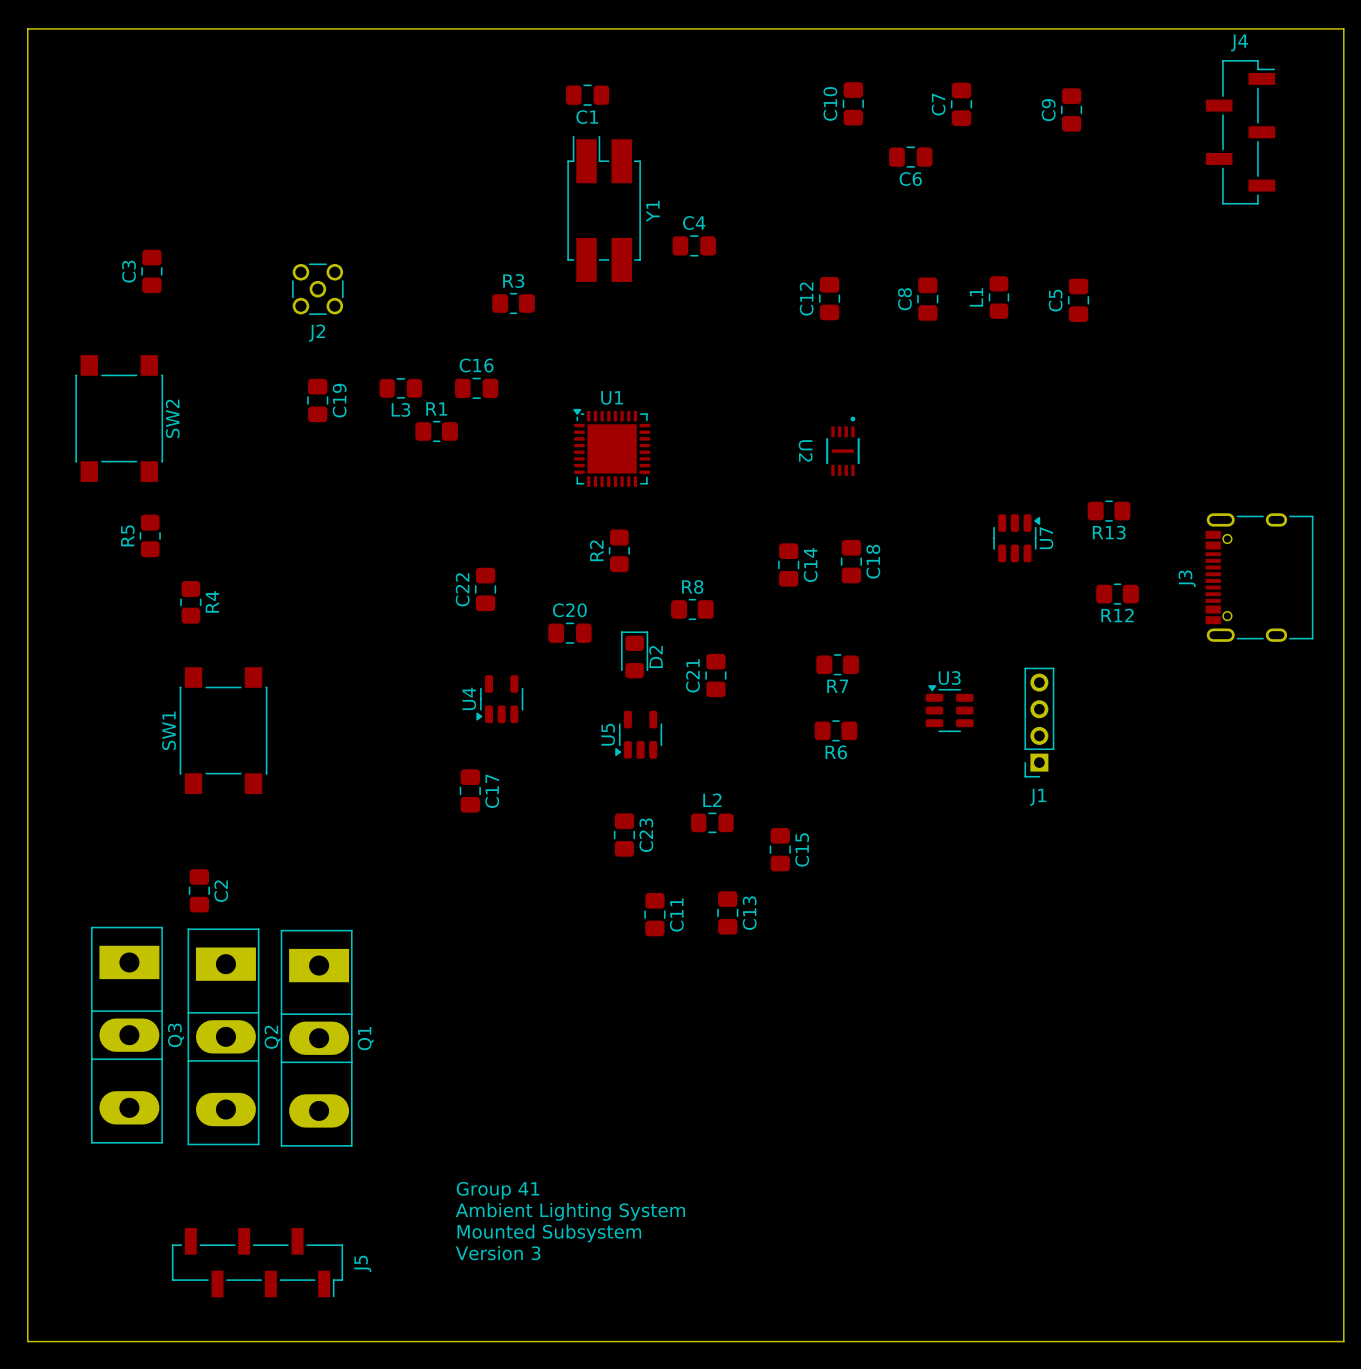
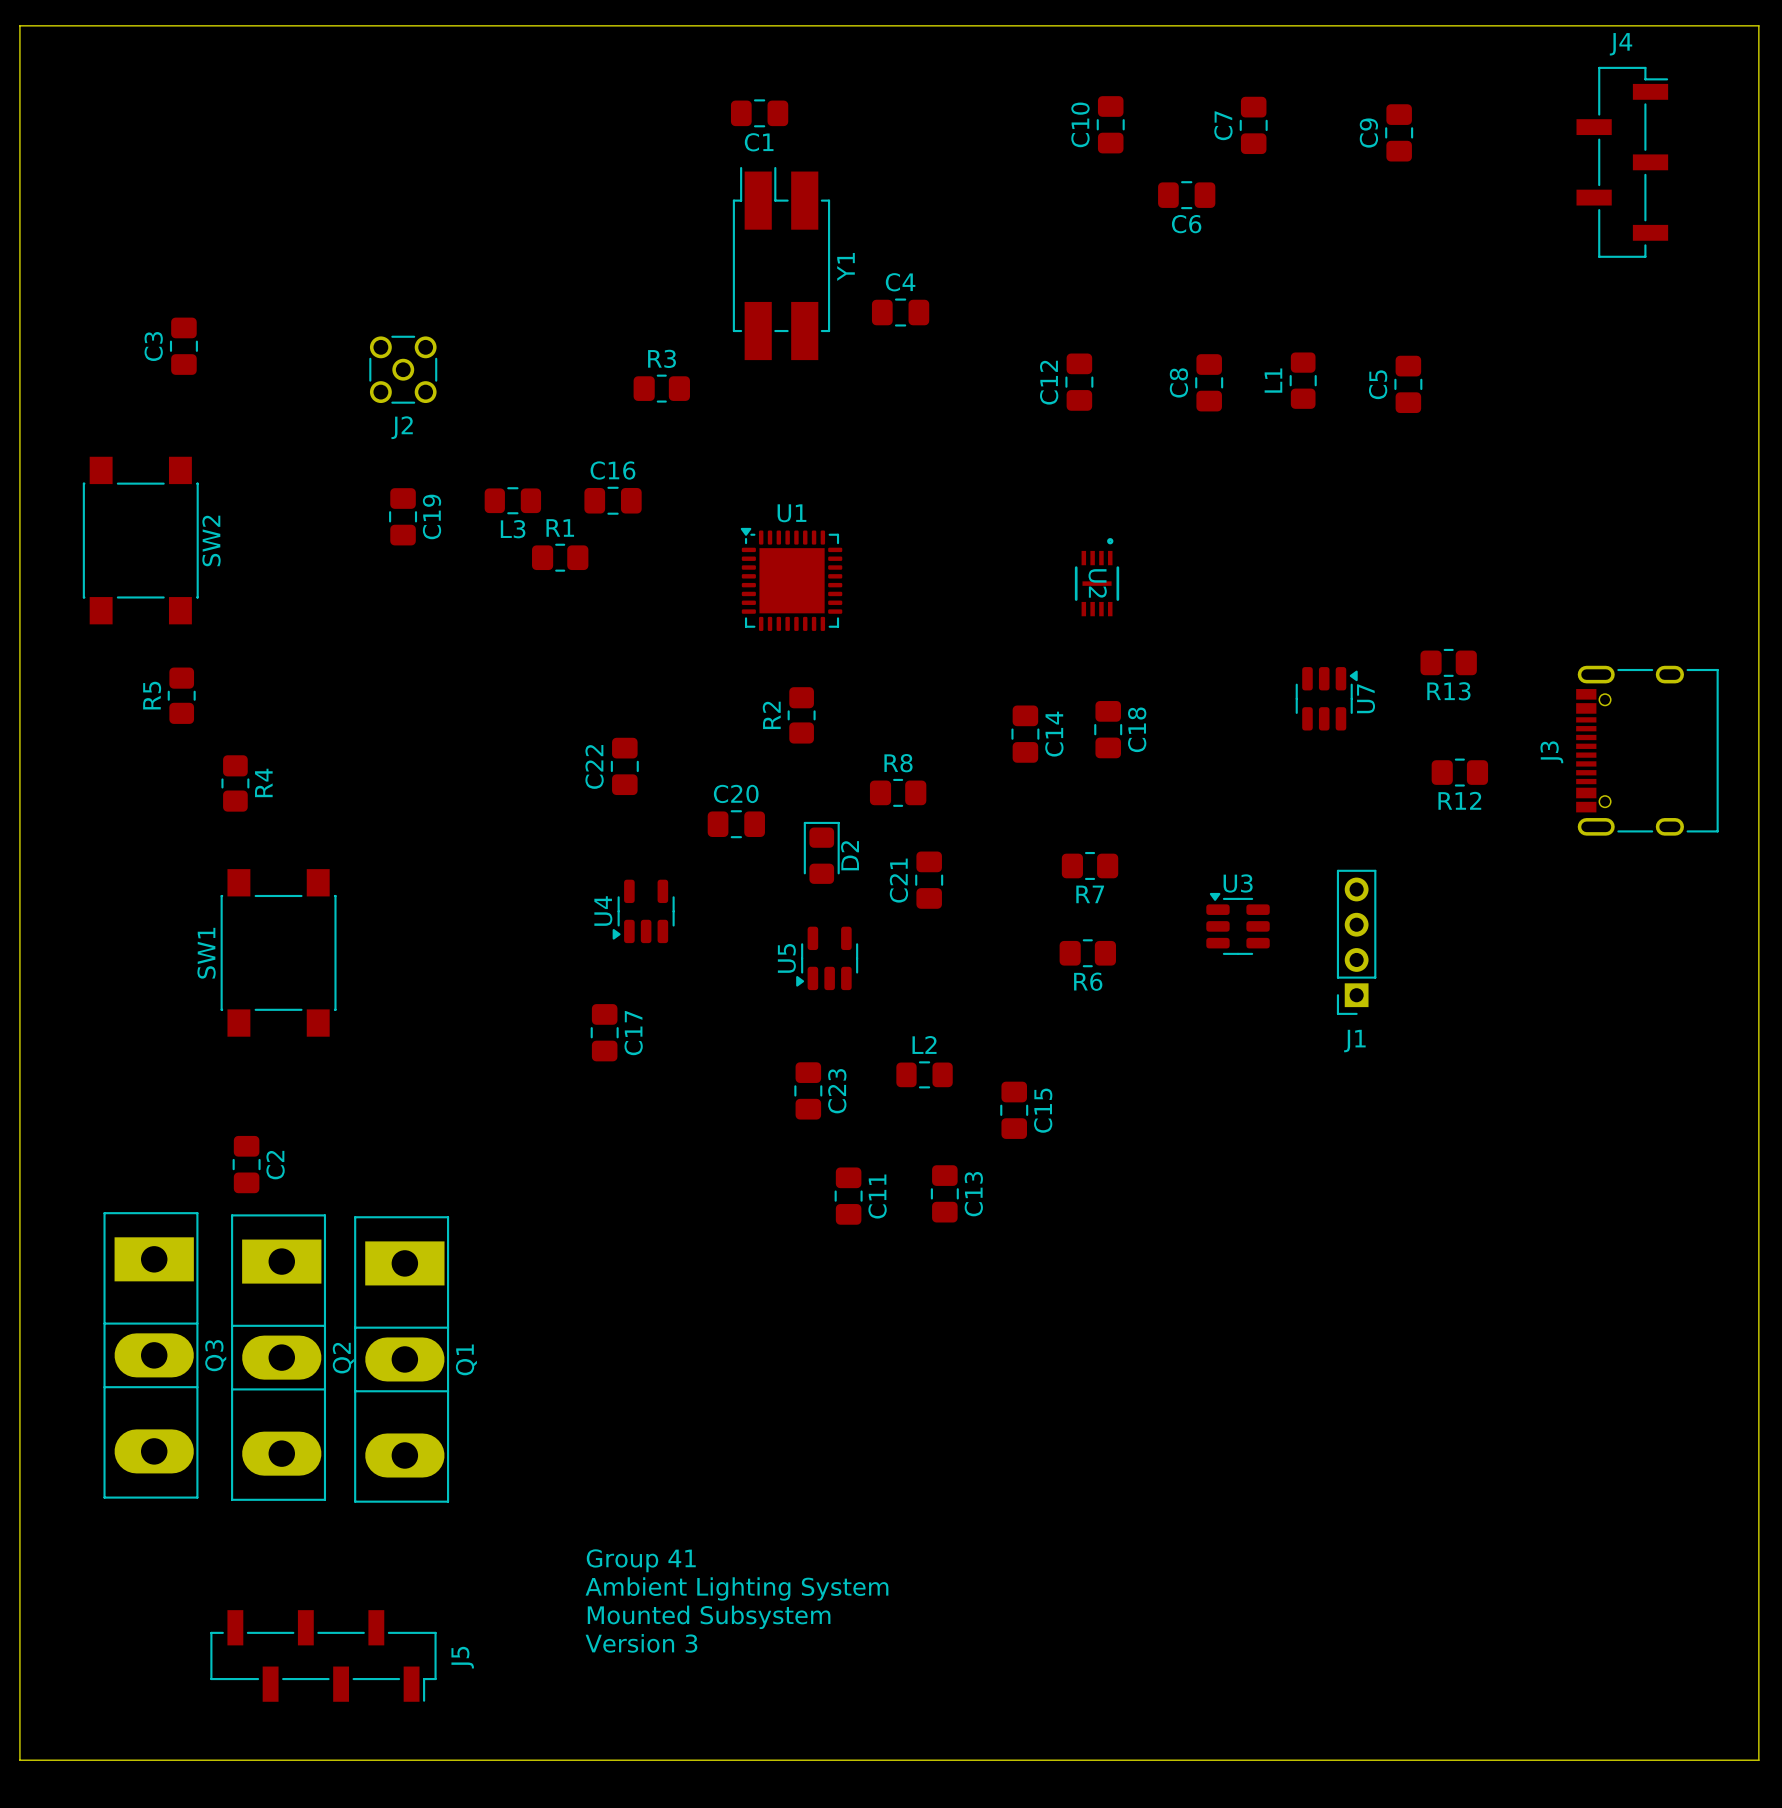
U2 name position: U2 (805, 450) -> U2 (1097, 583)

